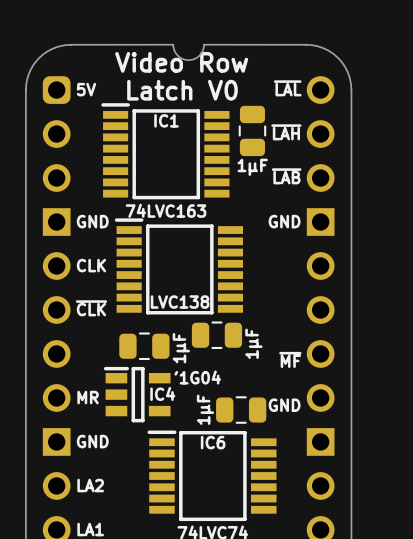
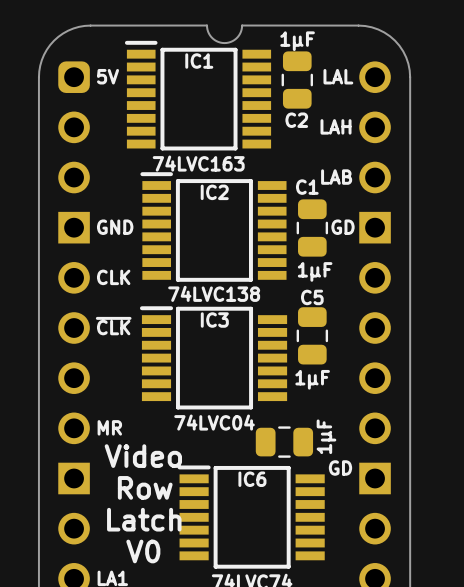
text: Video Row (181, 62) -> none
text: ~{LAL} (287, 88) -> LAL (338, 76)
text: Latch V0 (182, 90) -> none
C2: none -> 1μF (297, 80)
part: 1μF (252, 130) -> none
text: ~{LAH} (286, 132) -> LAH (336, 126)
IC1 position: (165, 151) -> (198, 95)
text: ~{LAB} (286, 176) -> LAB (336, 177)
IC2: none -> (213, 226)
text: GND (284, 221) -> GD (342, 227)
C1: none -> 1μF (312, 227)
part: (178, 266) -> none
C5: none -> 1μF (312, 335)
part: 1μF (216, 335) -> none
IC3: none -> (213, 357)
part: 1μF (144, 346) -> none
text: ~{MF} (290, 359) -> none
IC4: (137, 394) -> none
text: GND (284, 405) -> none
part value position: 1μF (205, 409) -> 1μF (326, 436)
text: none -> Video (143, 456)
text: none -> GD (340, 467)
text: GND (92, 441) -> none
text: none -> Row (145, 487)
text: none -> Latch (144, 519)
text: LA2 (90, 485) -> none
text: none -> V0 (143, 551)

